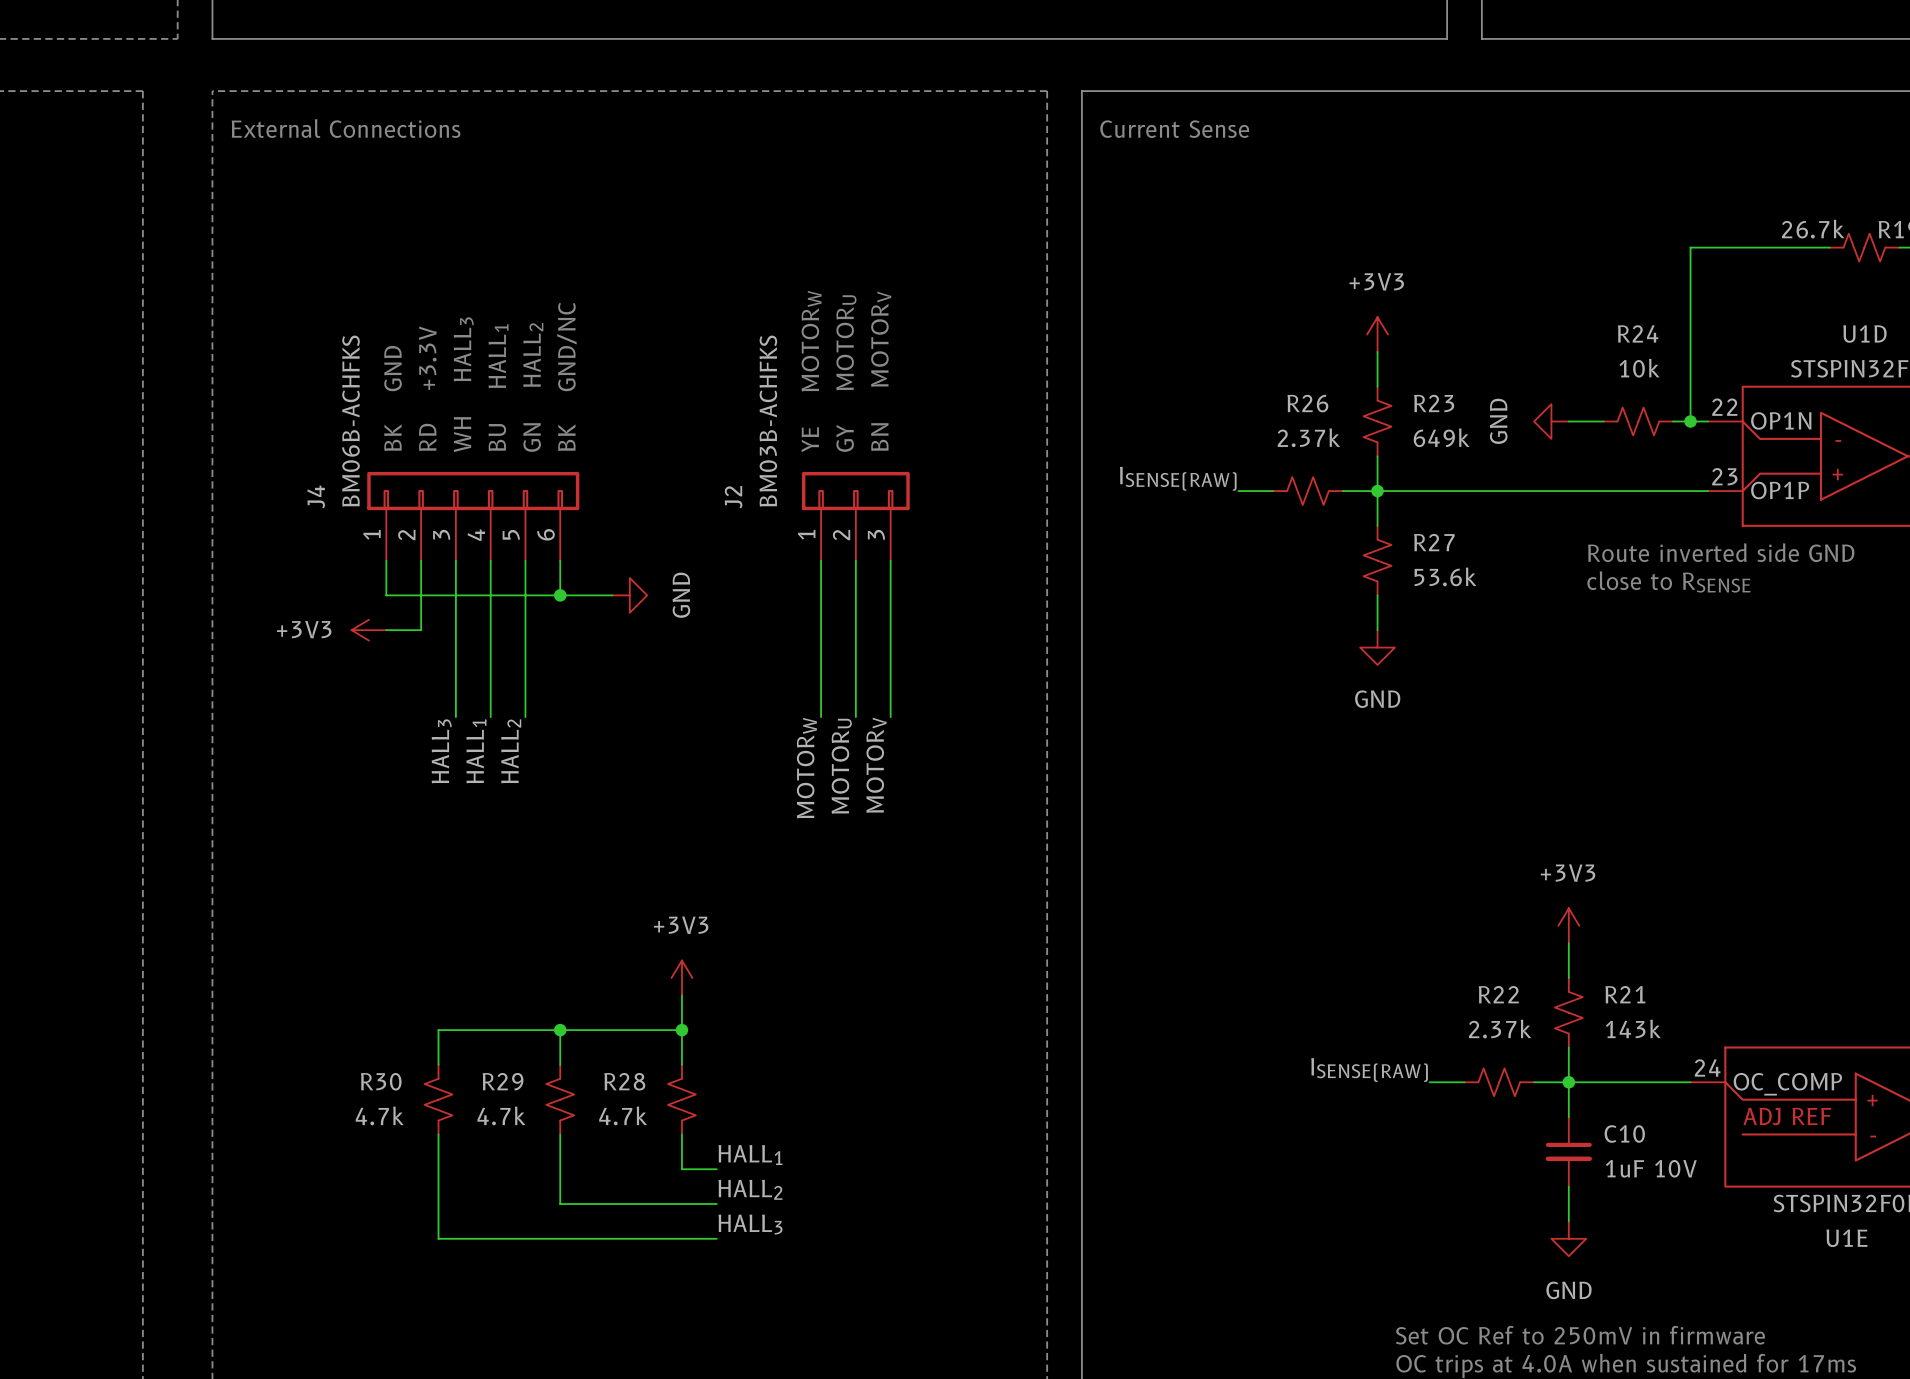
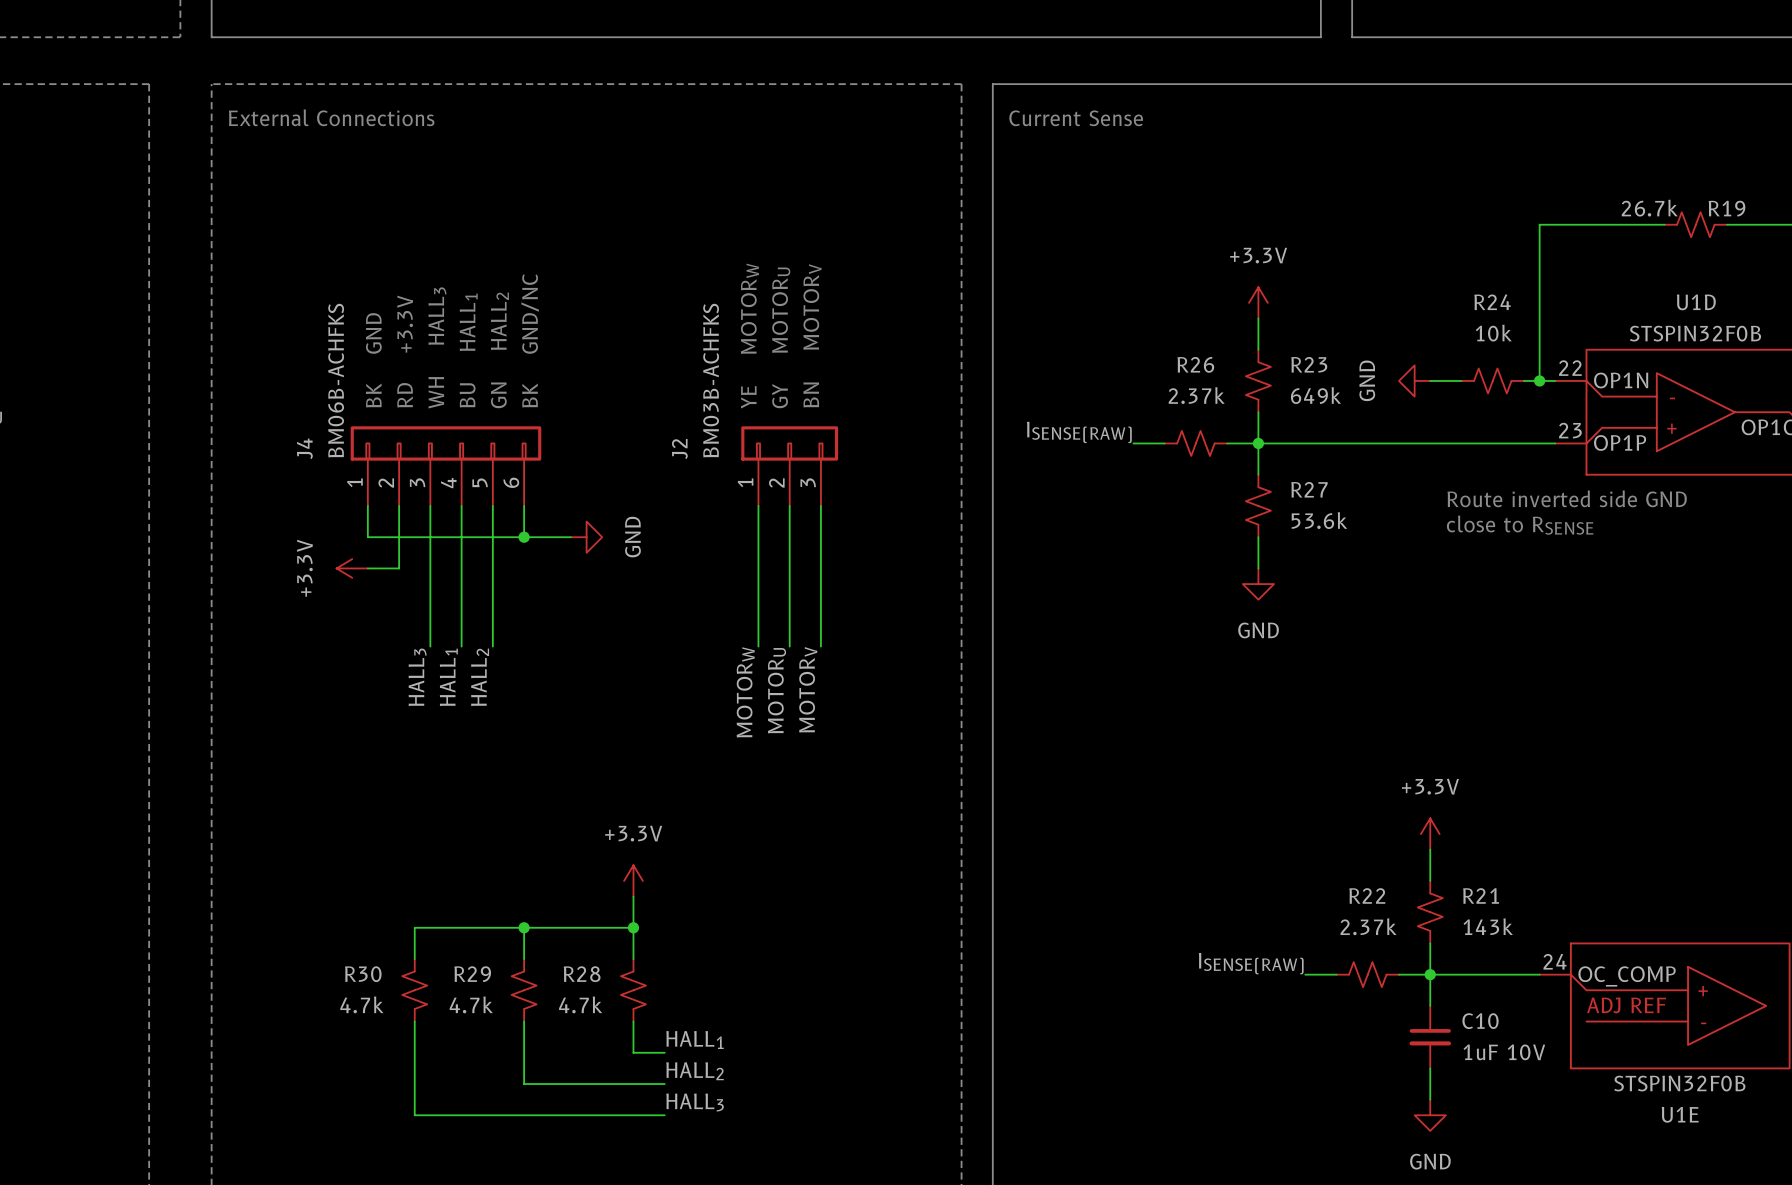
power symbol: +3V3 (1377, 334) -> +3.3V (1258, 302)
power symbol: +3V3 (368, 630) -> +3.3V (352, 568)
power symbol: +3V3 (1568, 925) -> +3.3V (1430, 834)
power symbol: +3V3 (681, 977) -> +3.3V (633, 880)

